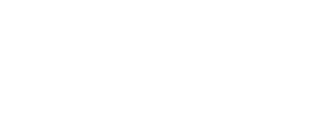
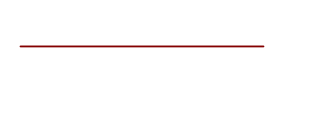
part: none -> (141, 46)

